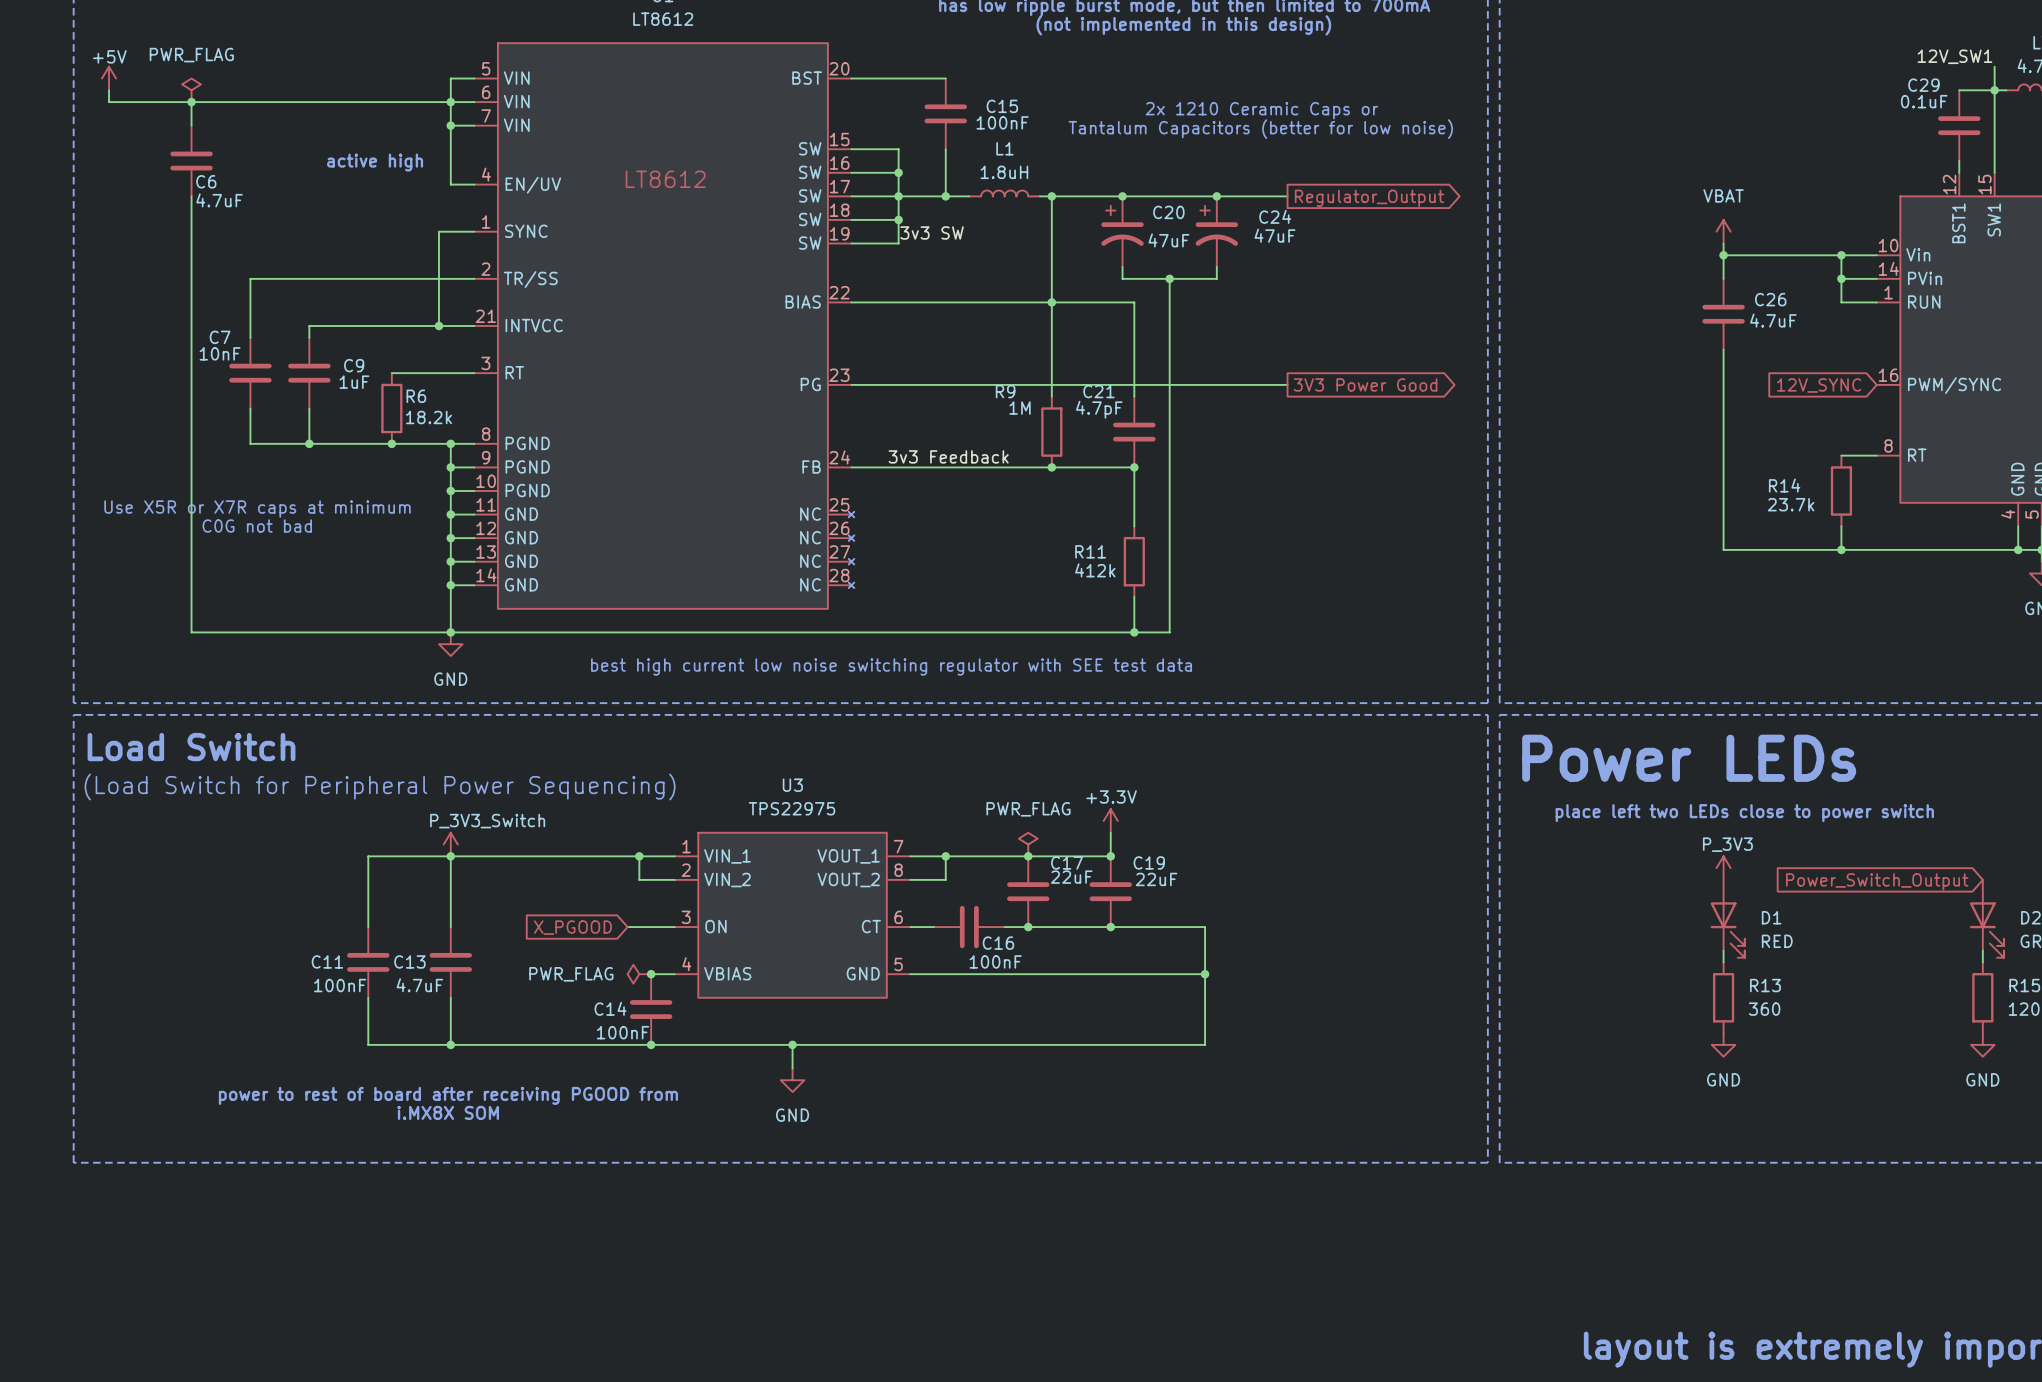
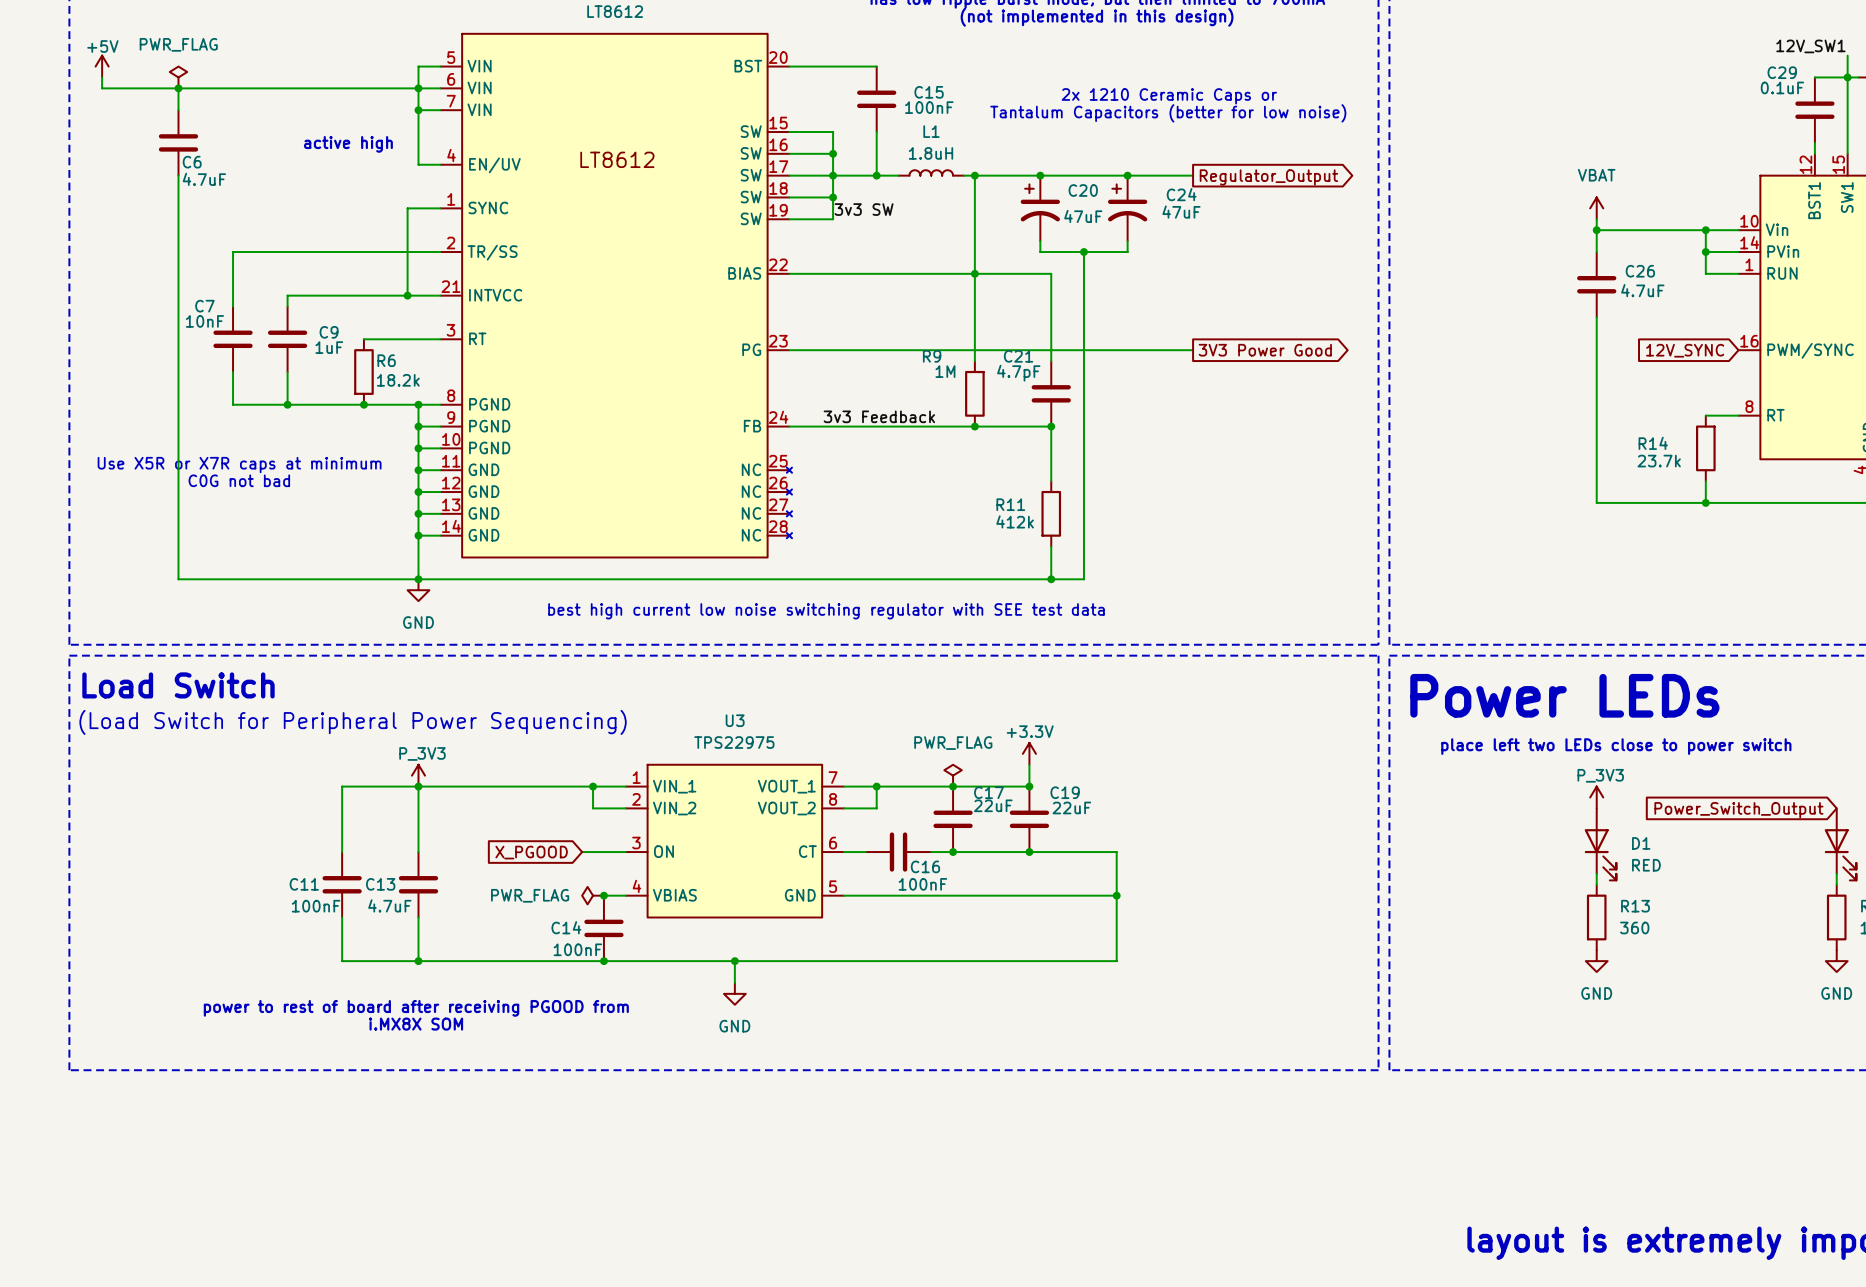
power symbol: P_3V3_Switch (450, 844) -> P_3V3 (418, 775)

